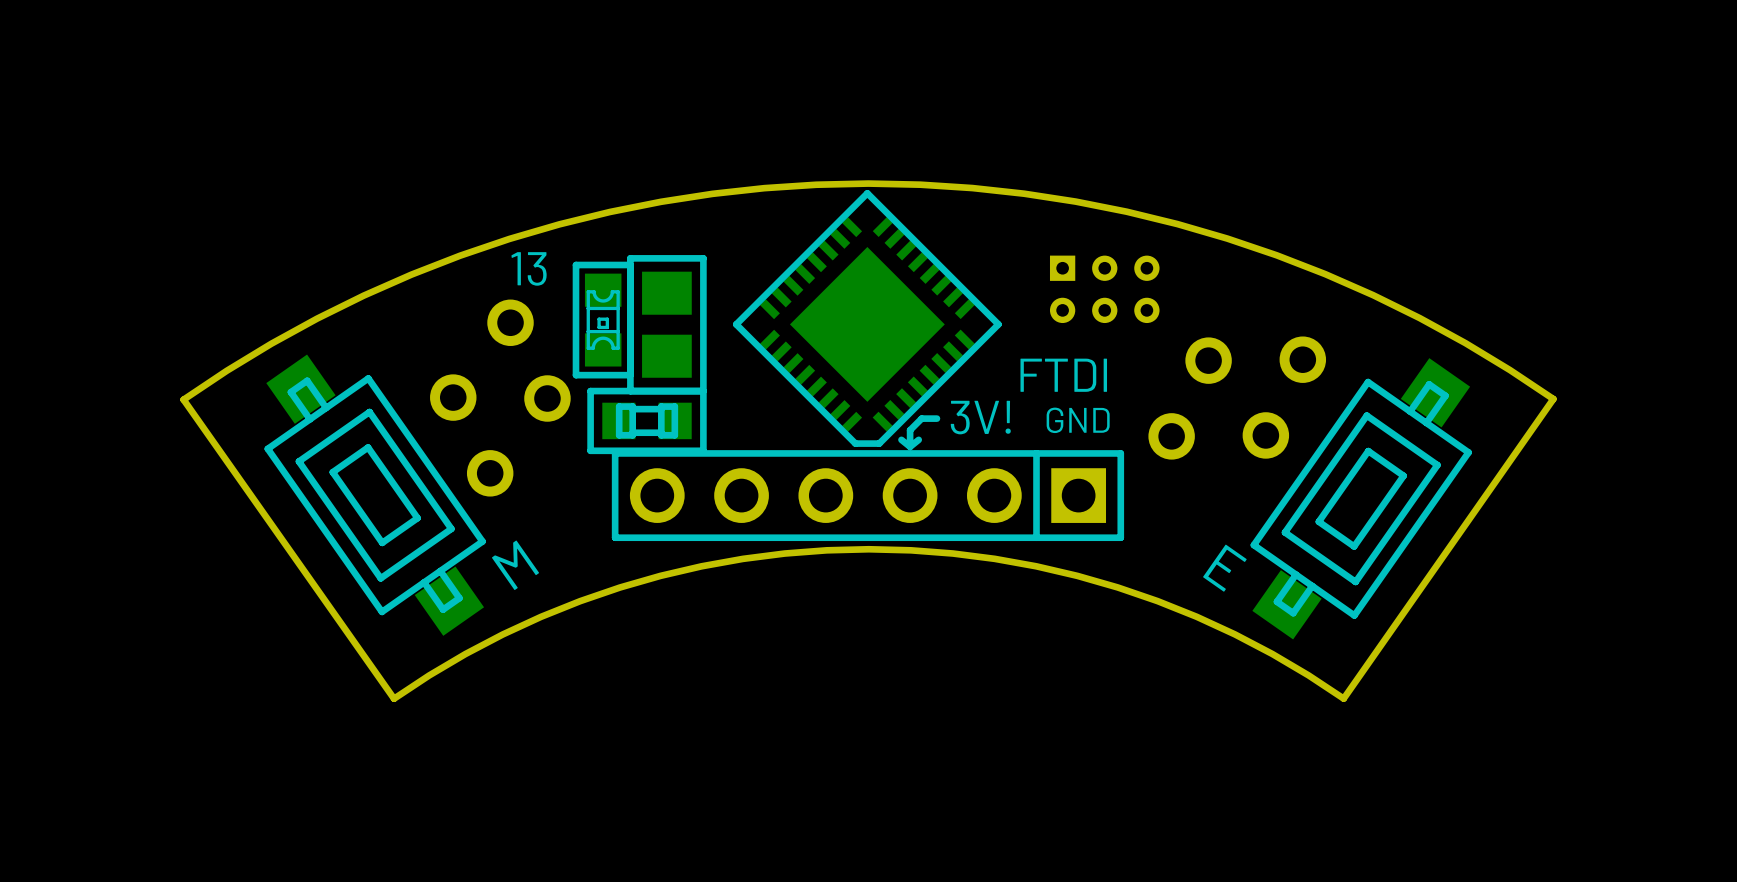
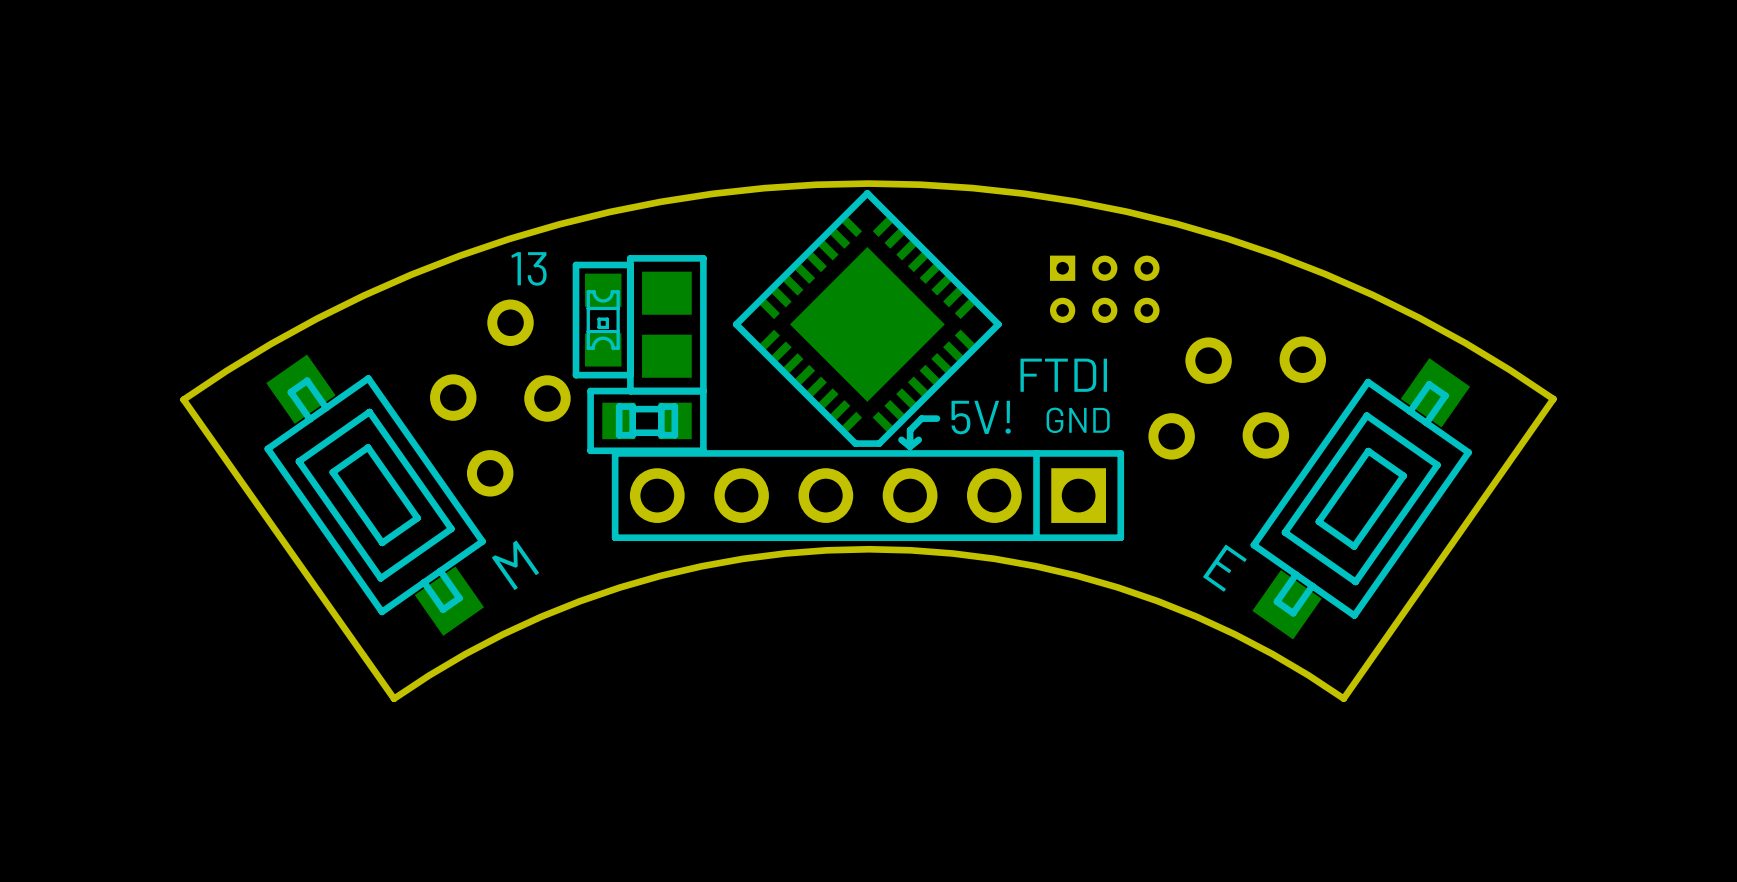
text: 3V! (980, 417) -> 5V! (981, 417)

